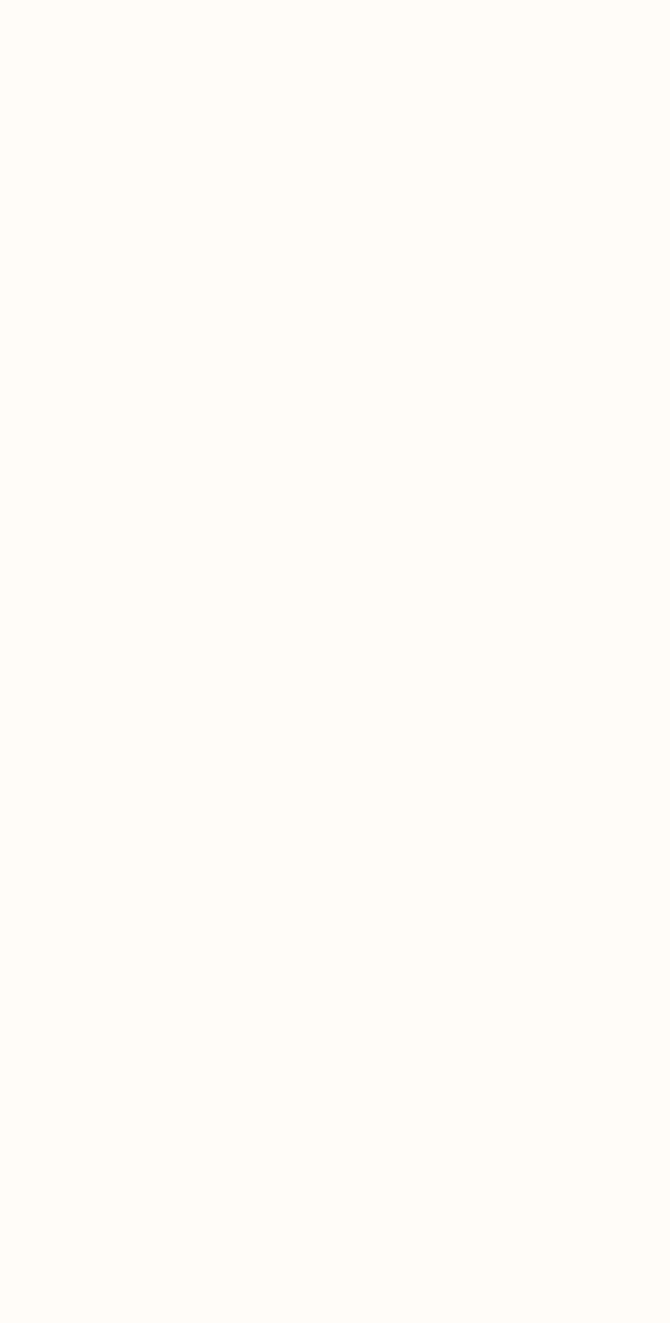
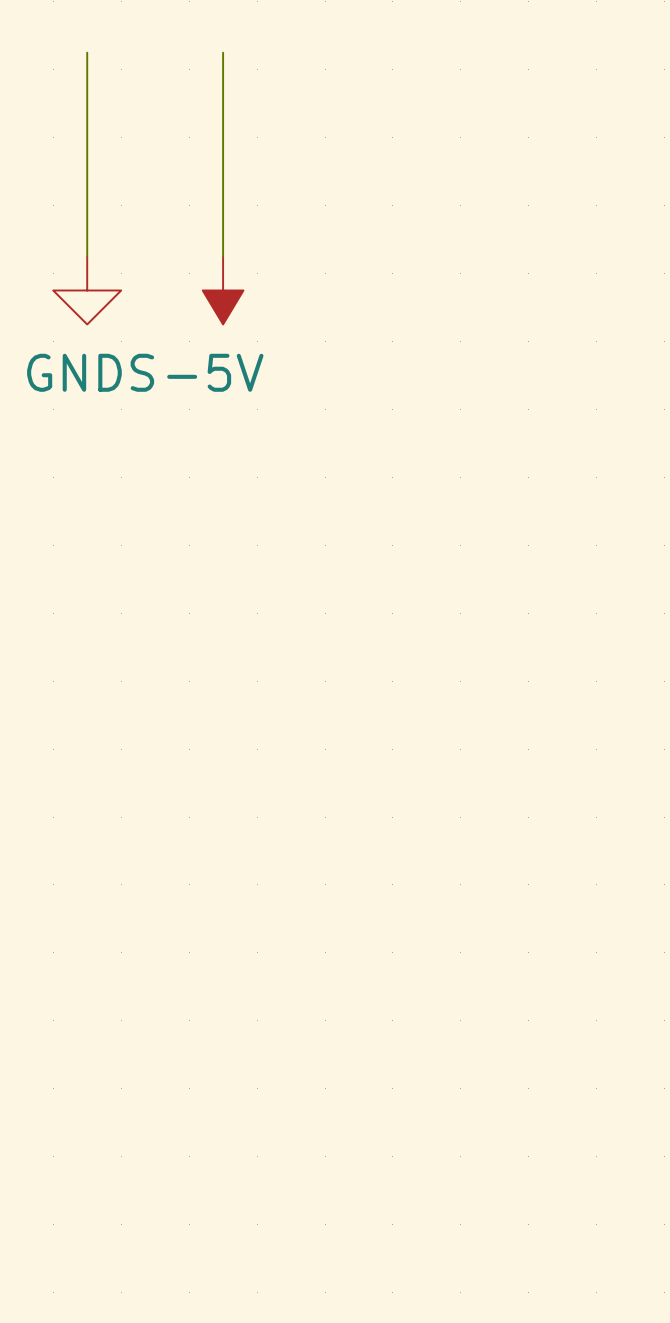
wire: none -> (87, 52) (87, 256)
wire: none -> (223, 52) (223, 256)
power symbol: none -> GNDS (87, 290)
power symbol: none -> -5V (223, 290)

